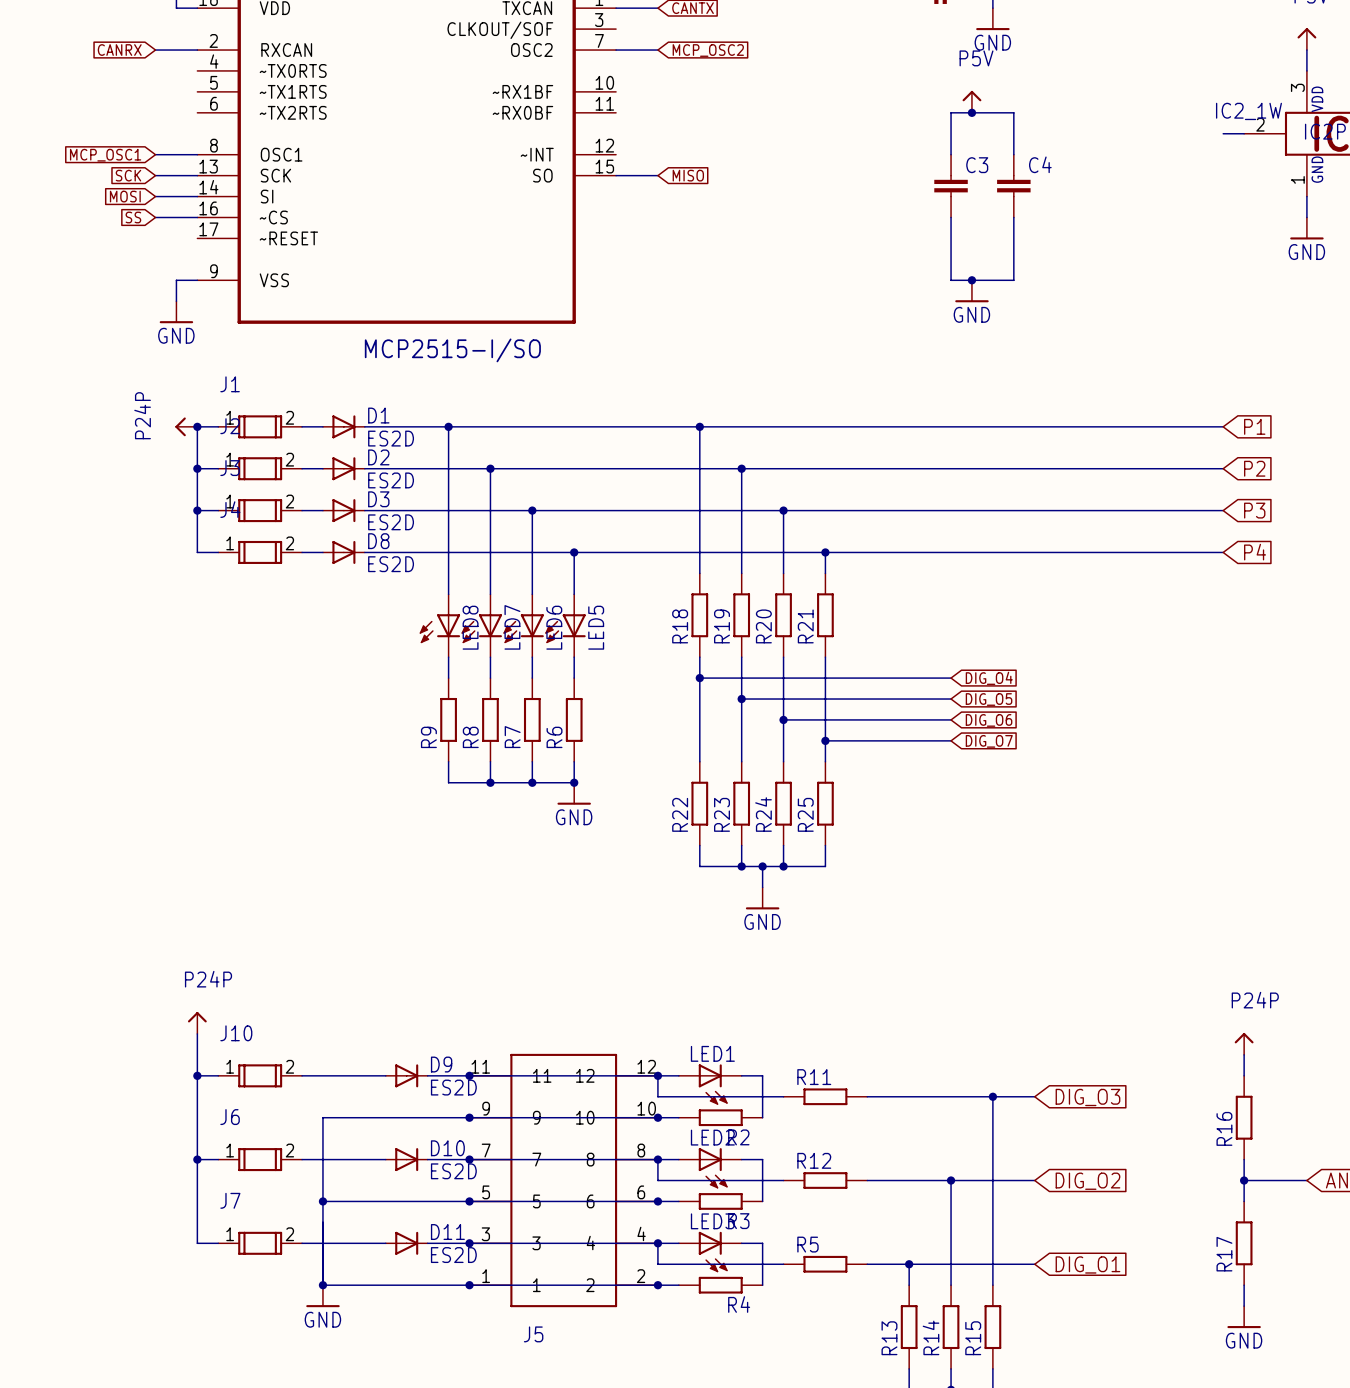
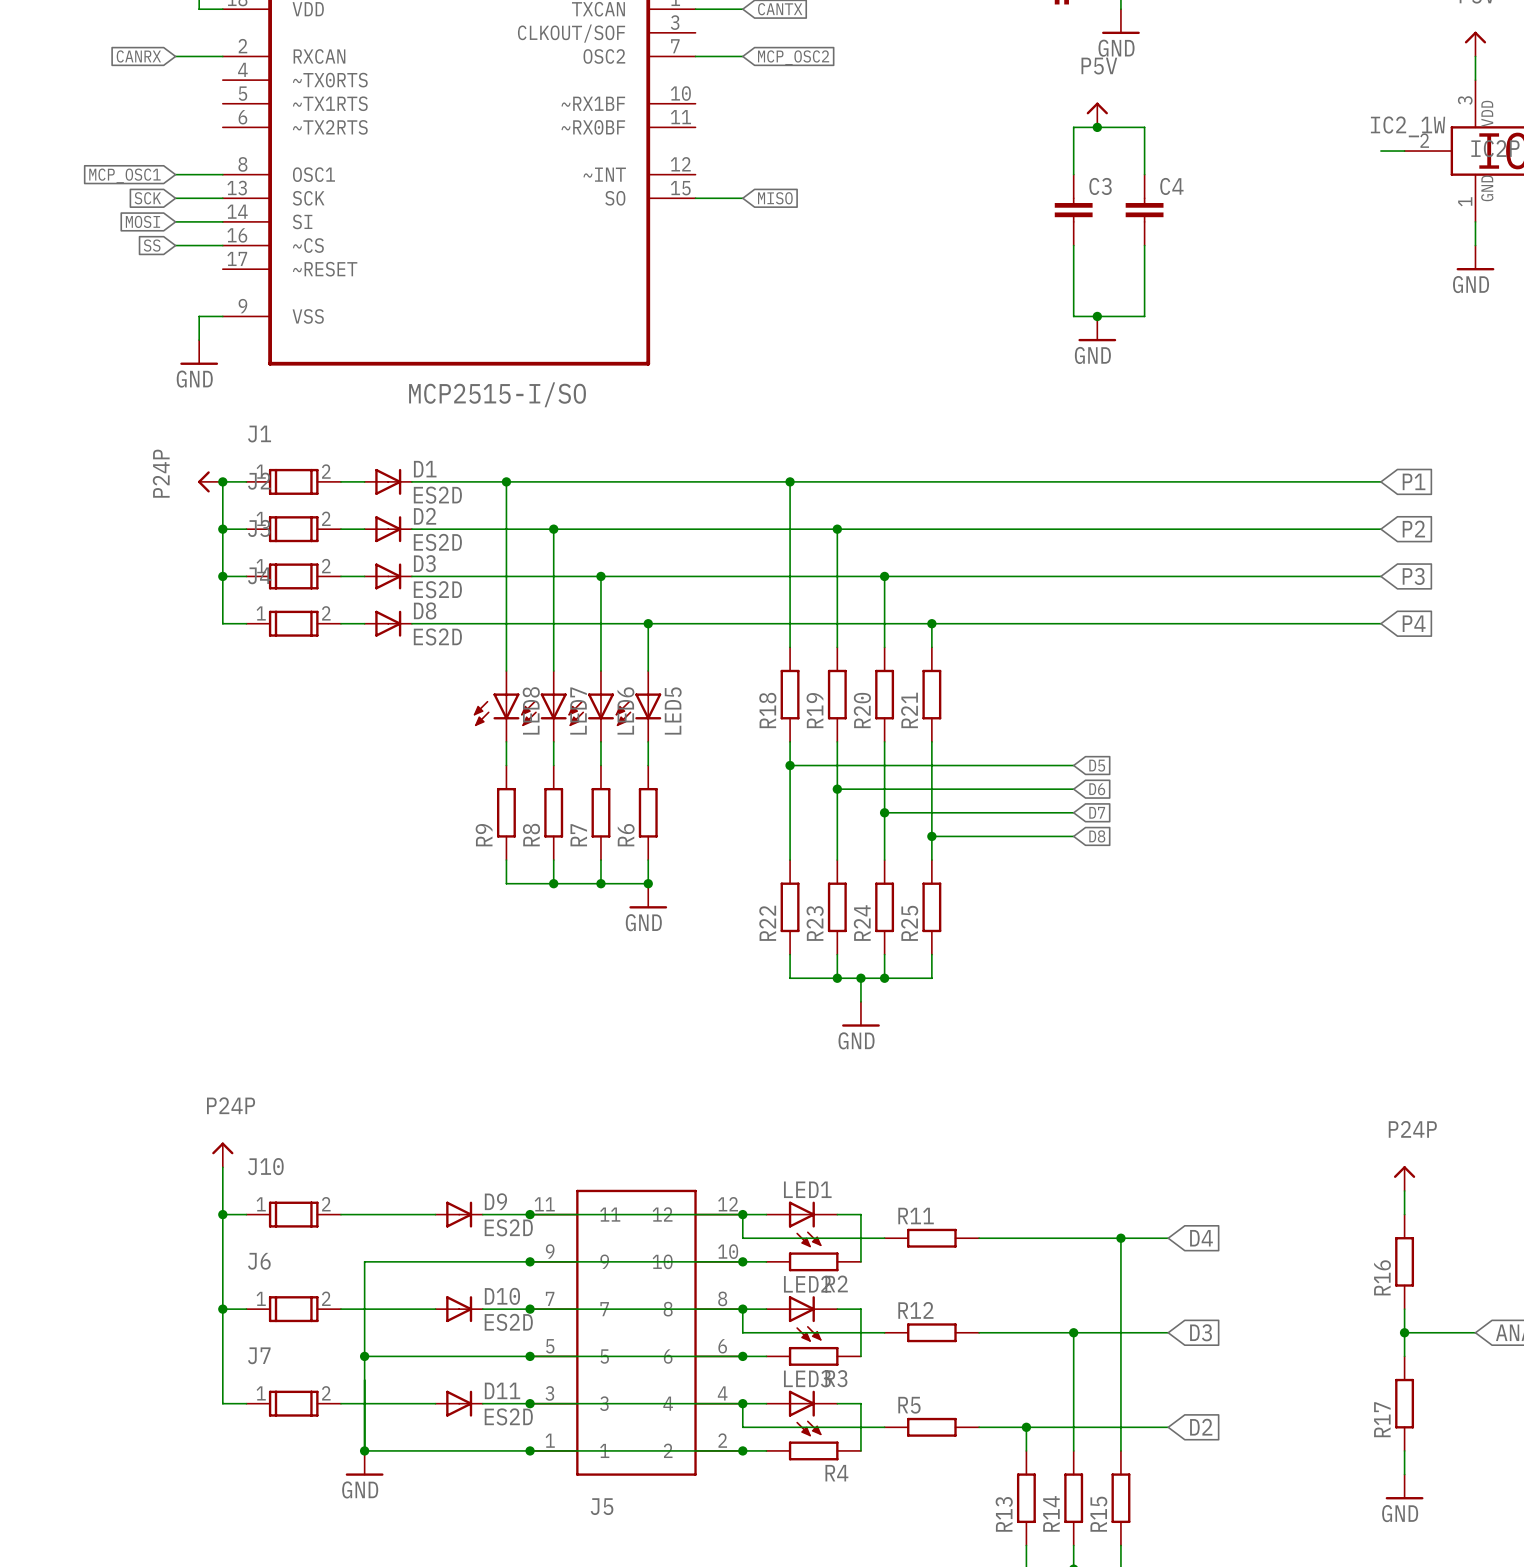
global label: DIG_O4 (989, 678) -> D5 (1097, 765)
global label: DIG_O5 (989, 699) -> D6 (1097, 789)
global label: DIG_O6 (989, 720) -> D7 (1097, 812)
global label: DIG_O7 (989, 741) -> D8 (1097, 836)
global label: DIG_O3 (1087, 1097) -> D4 (1201, 1238)
global label: DIG_O2 (1087, 1181) -> D3 (1201, 1332)
global label: DIG_O1 (1087, 1264) -> D2 (1201, 1427)

